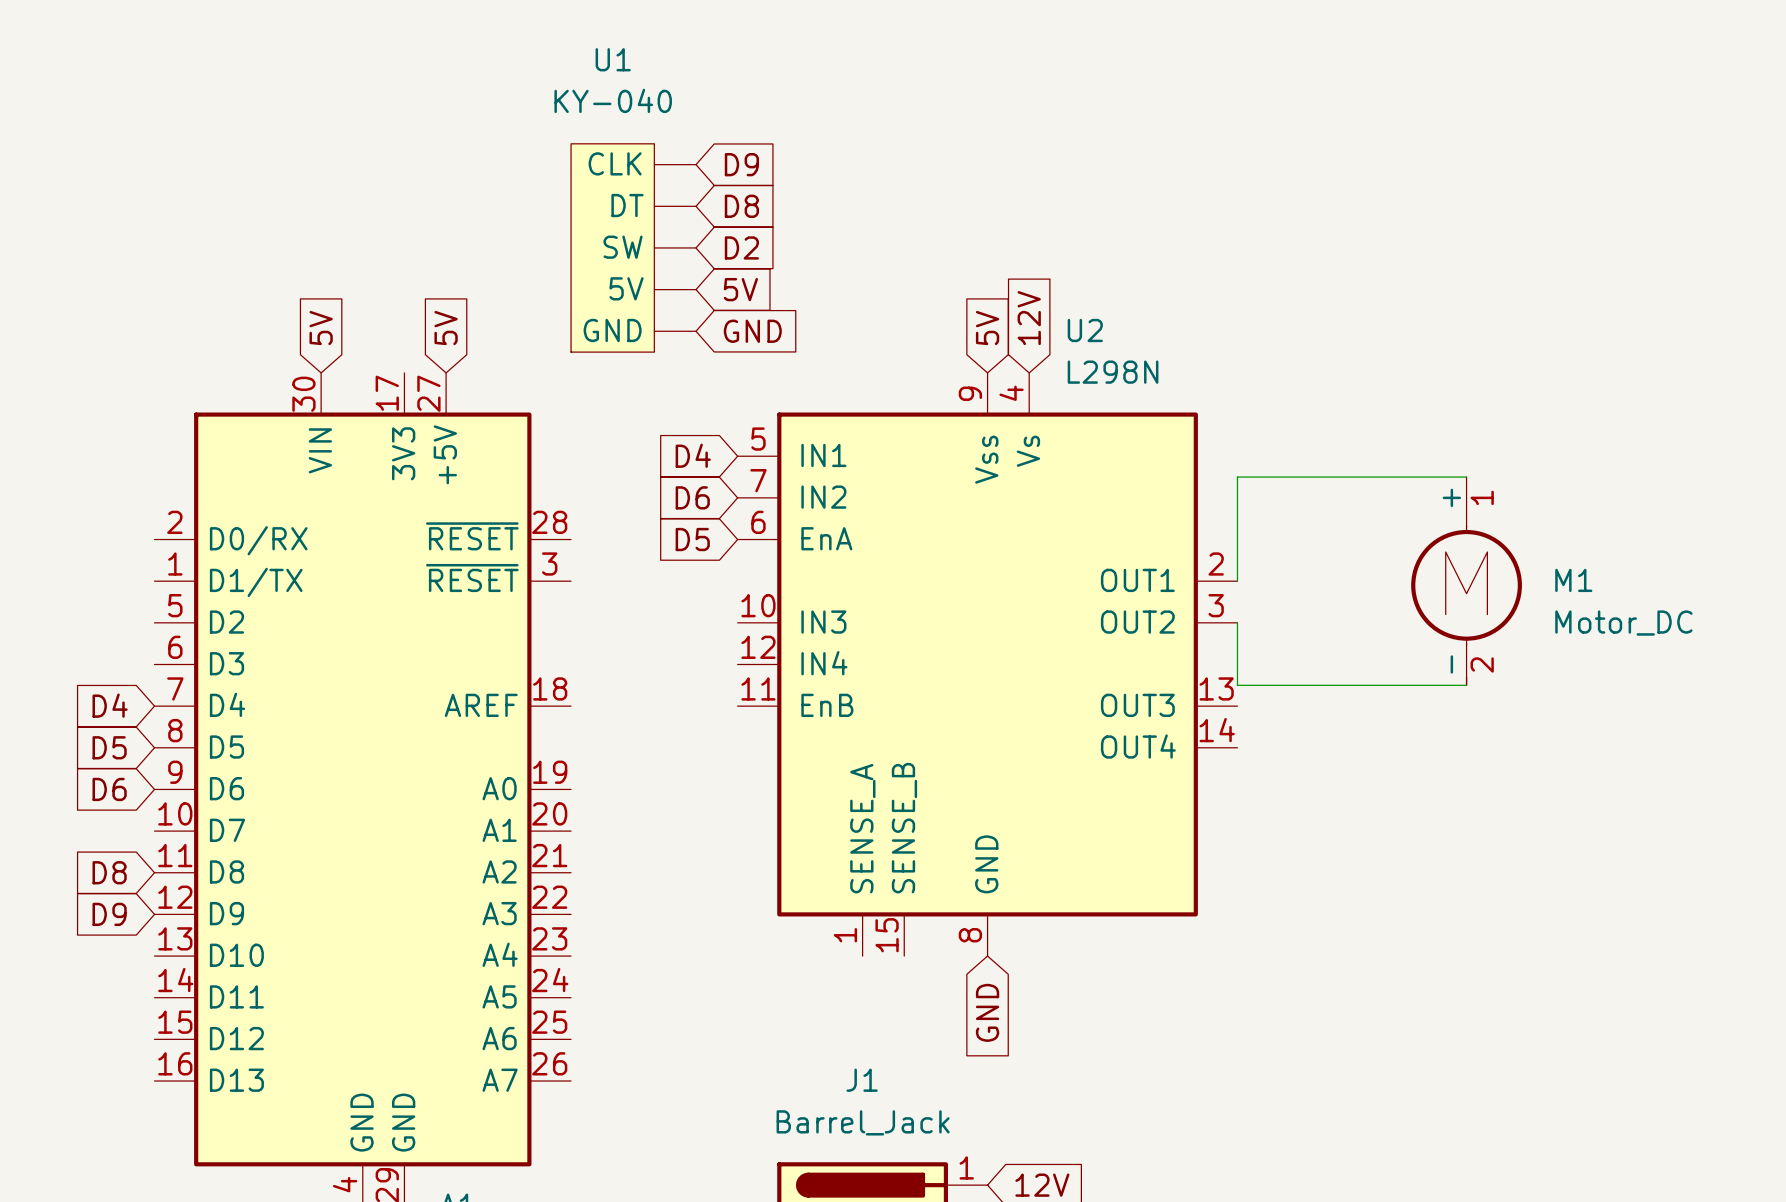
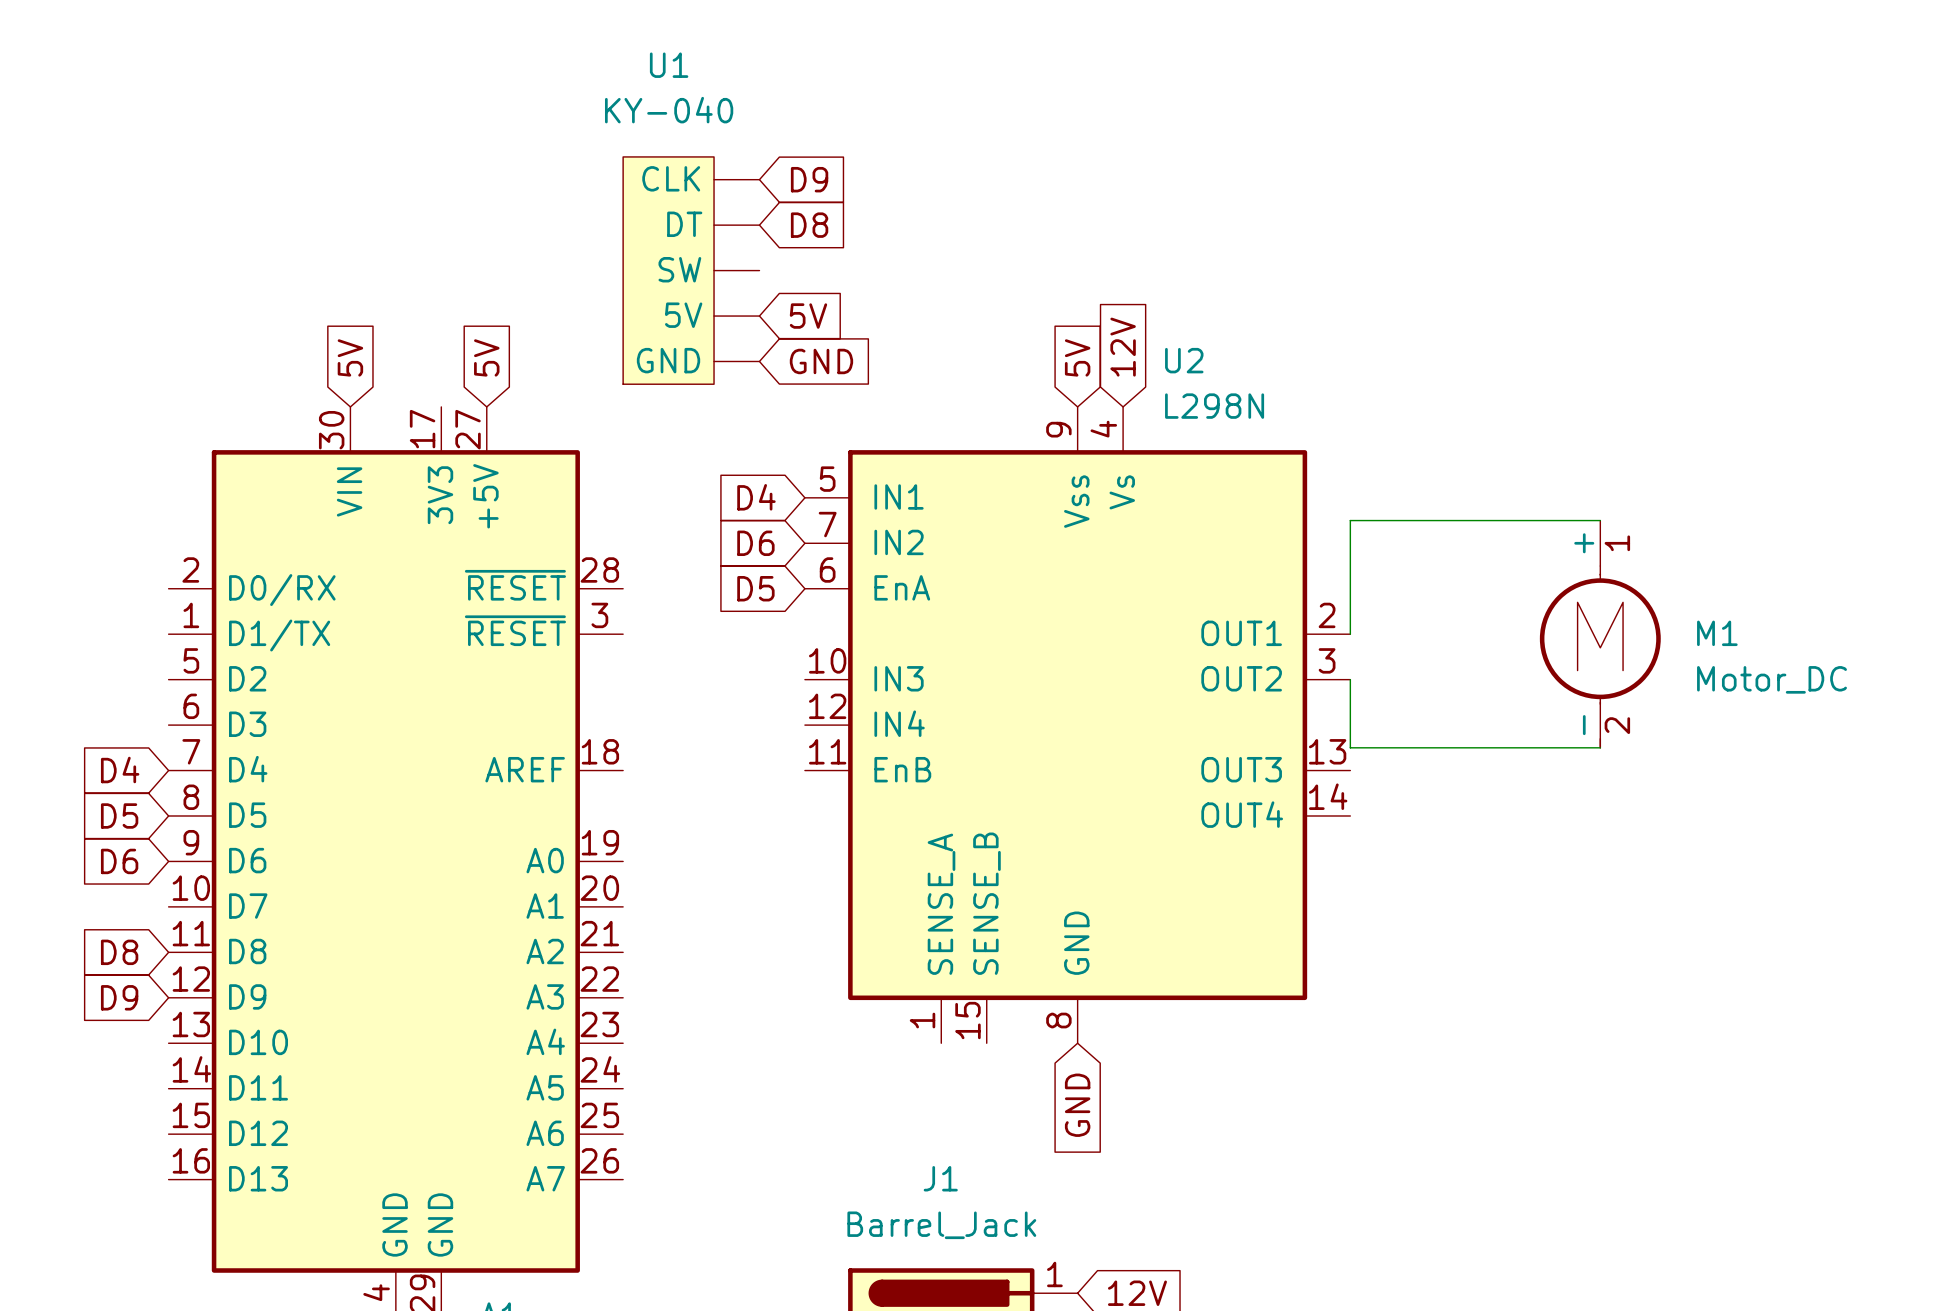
global label: D2 (741, 247) -> none

